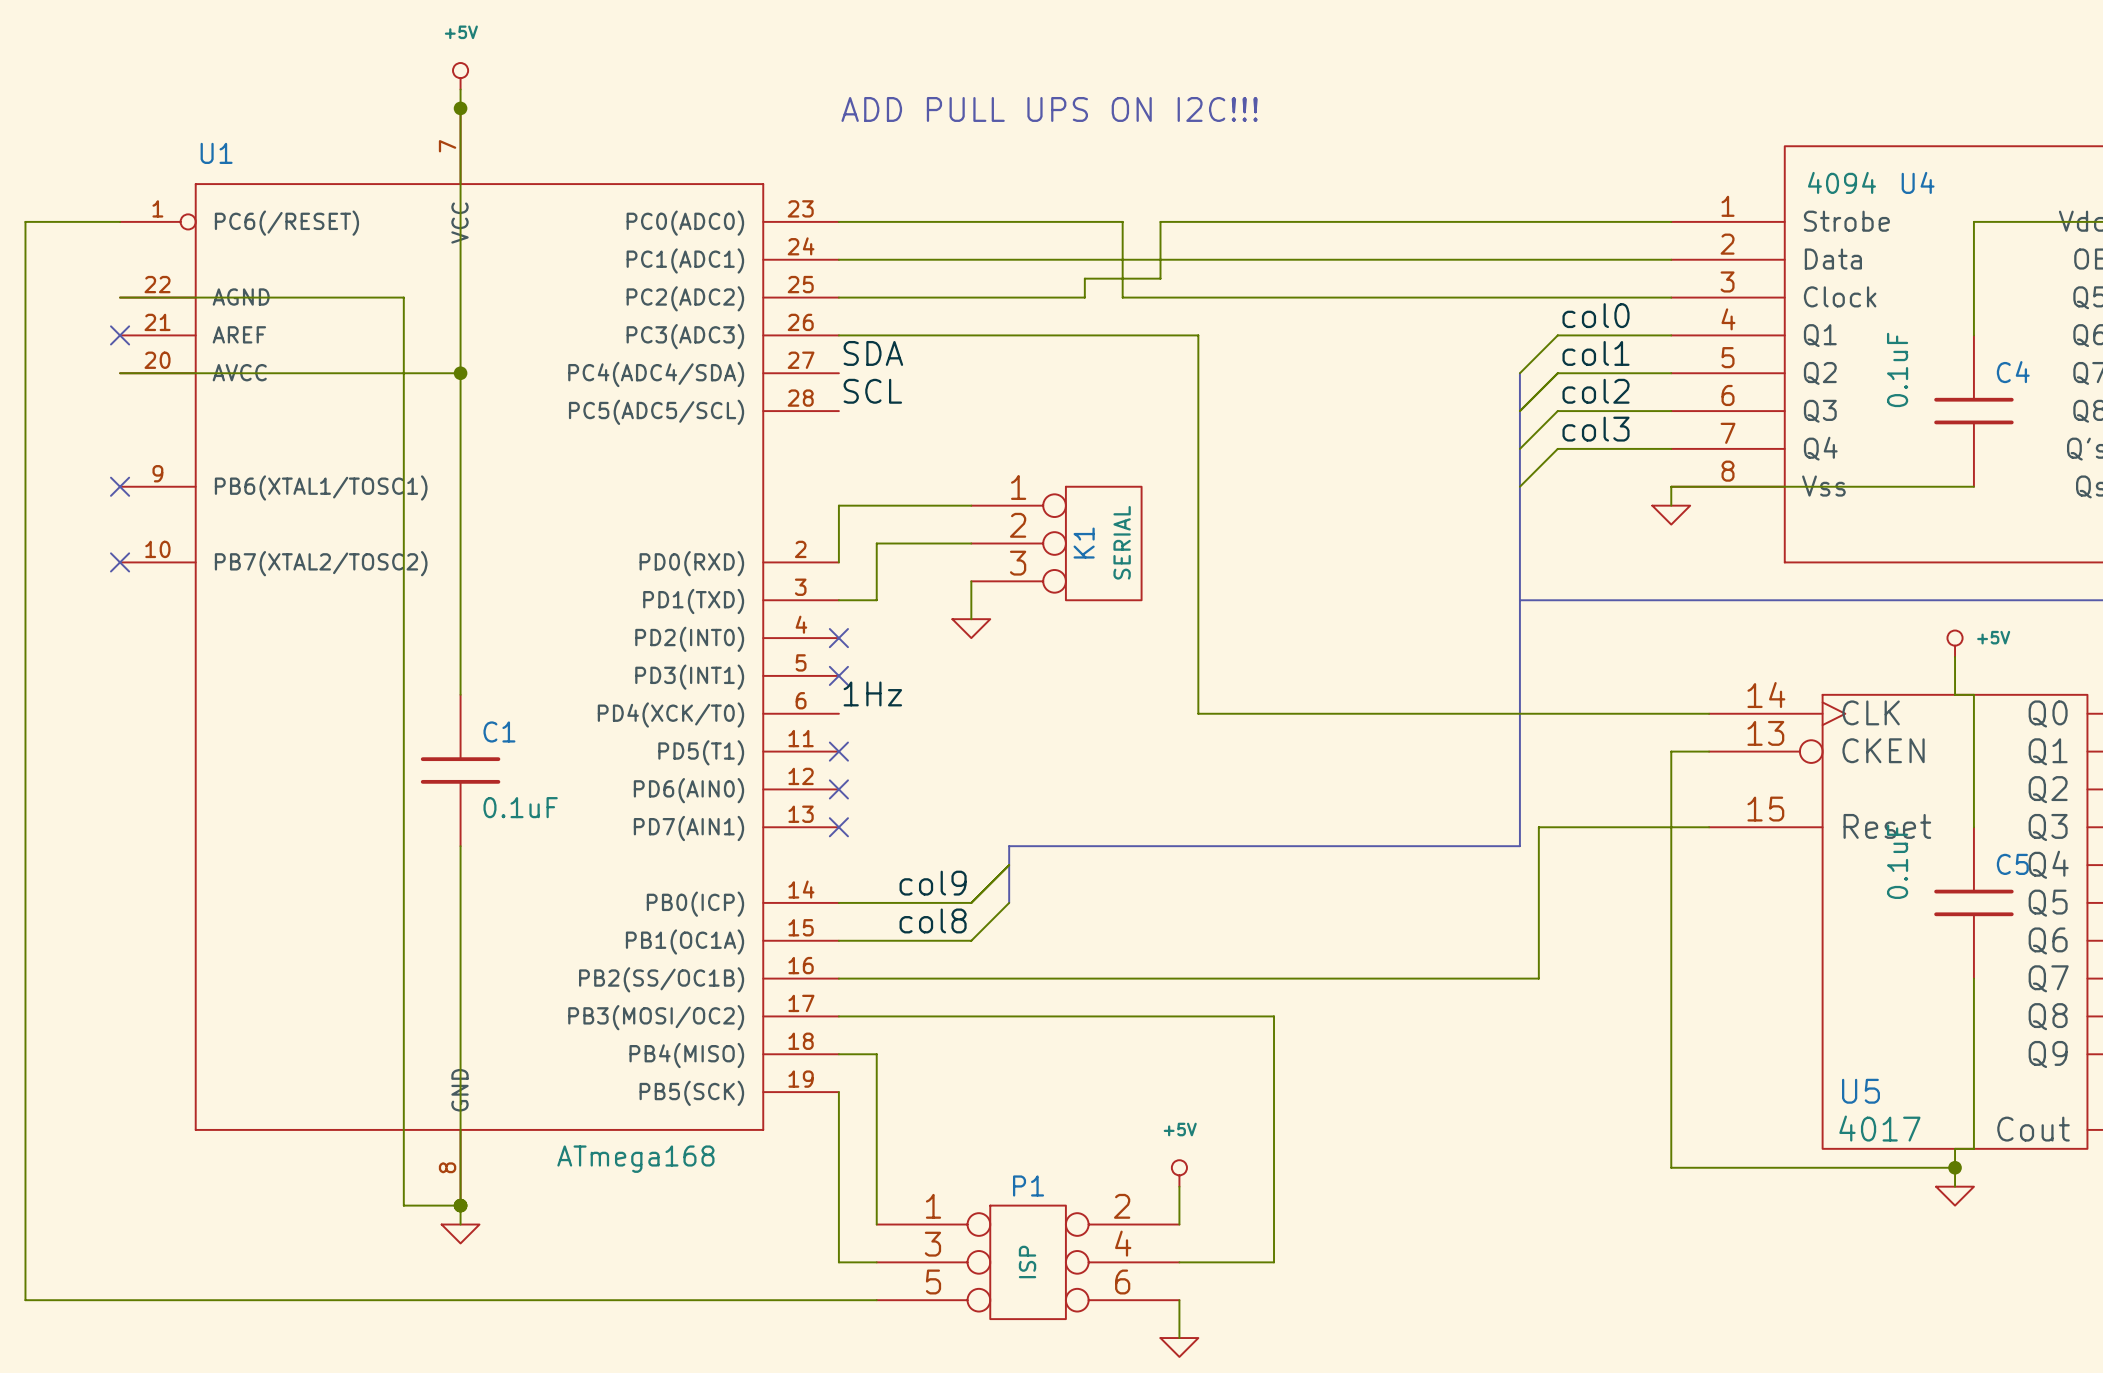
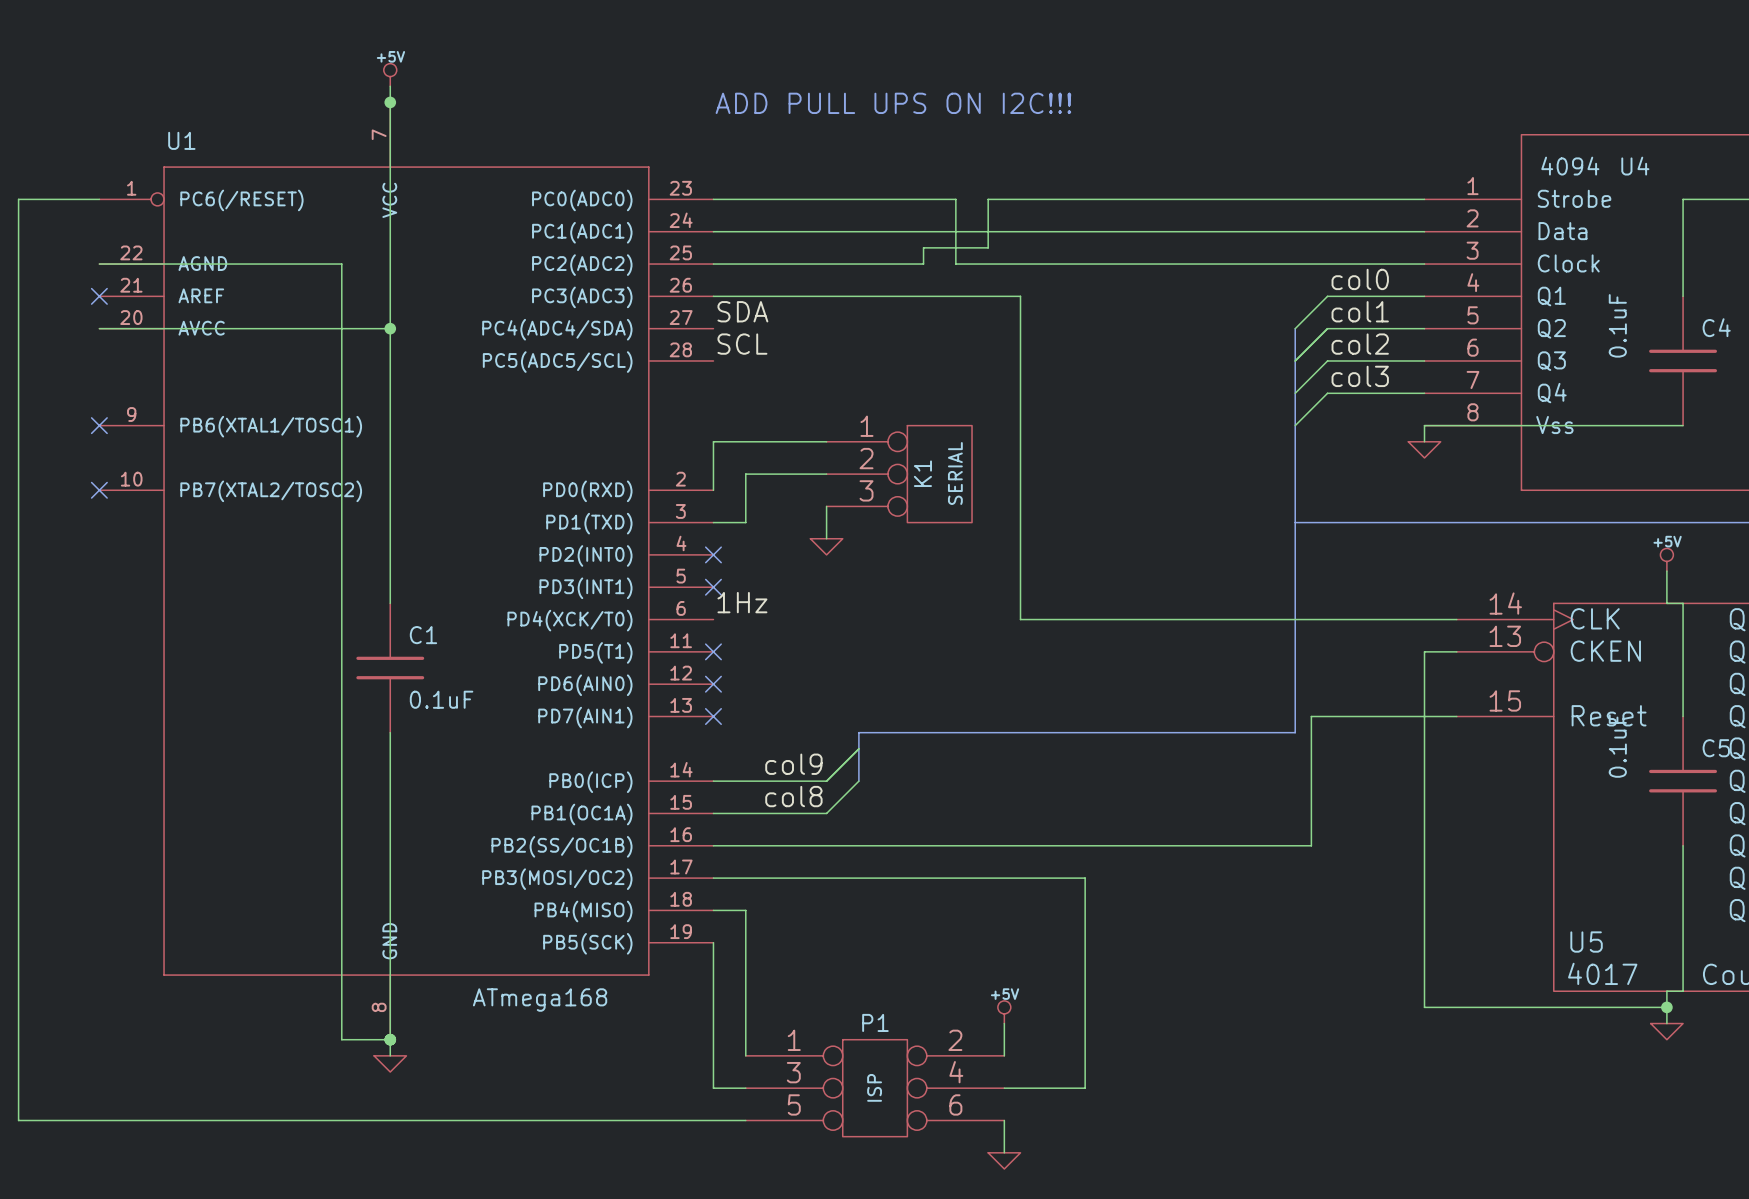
power symbol text position: +5V (461, 32) -> +5V (390, 56)
power symbol text position: +5V (1993, 637) -> +5V (1667, 541)
power symbol text position: +5V (1180, 1129) -> +5V (1005, 994)

